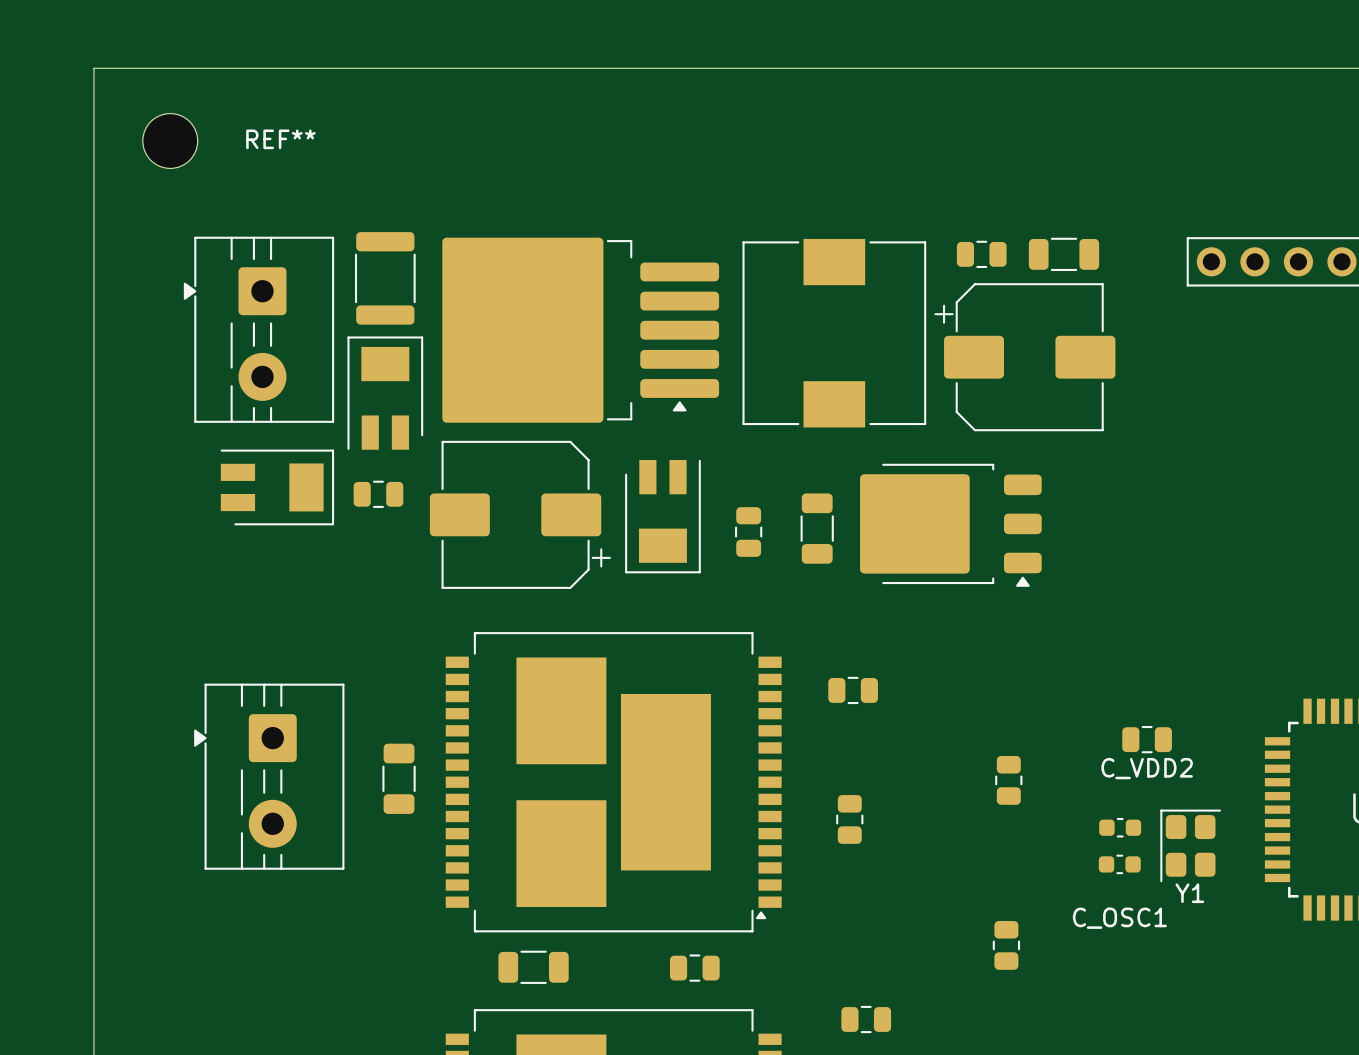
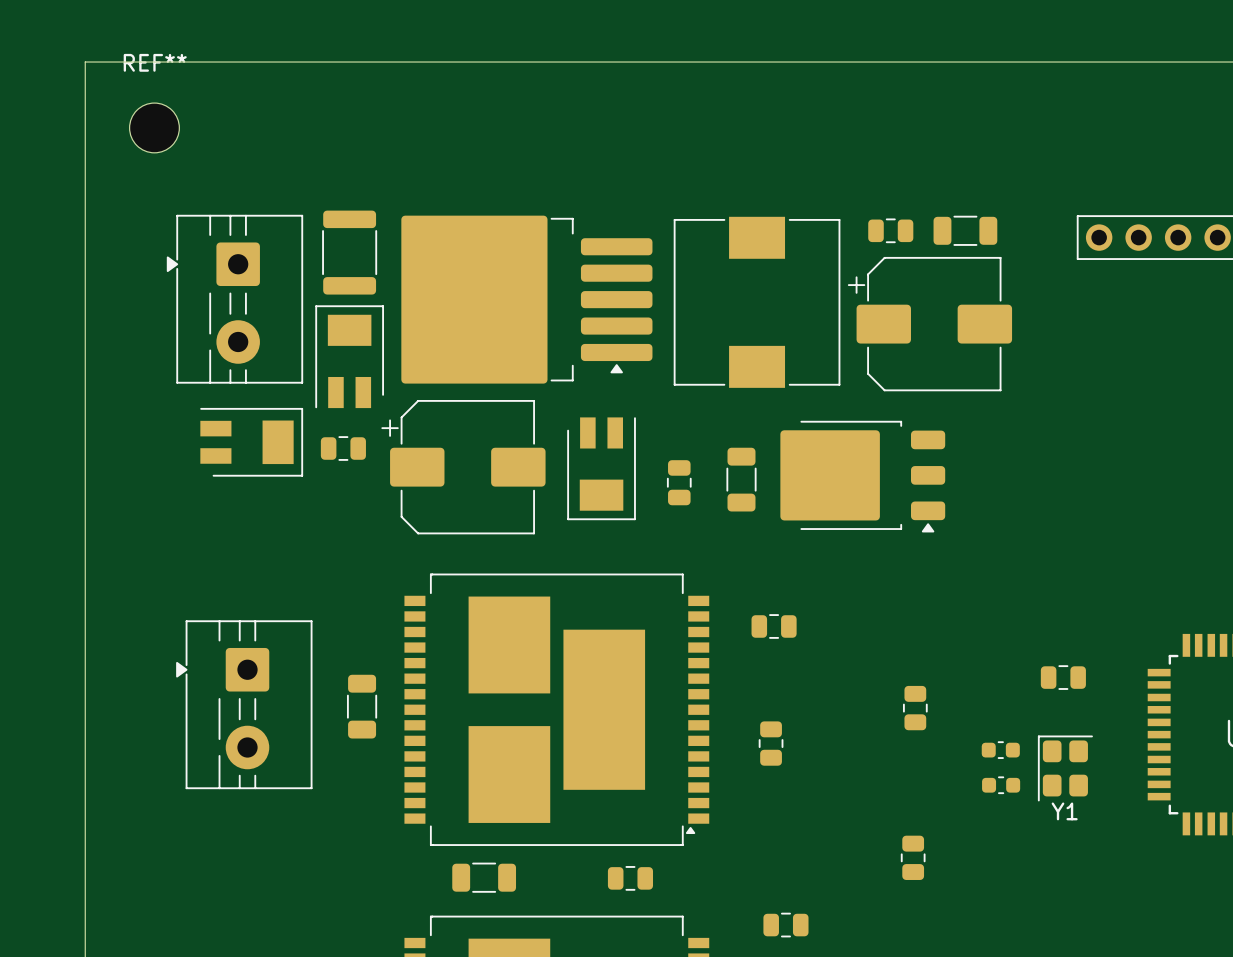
REF** name position: REF** (280, 139) -> REF** (155, 62)
part rotation: 0° (520, 514) -> 180° (463, 467)
C_VDD2: (1147, 739) -> none
part: none -> (1063, 677)
part: none -> (1000, 750)
C_OSC1: (1120, 827) -> none
Y1 position: (1190, 845) -> (1065, 768)
part position: (1119, 864) -> (1001, 785)

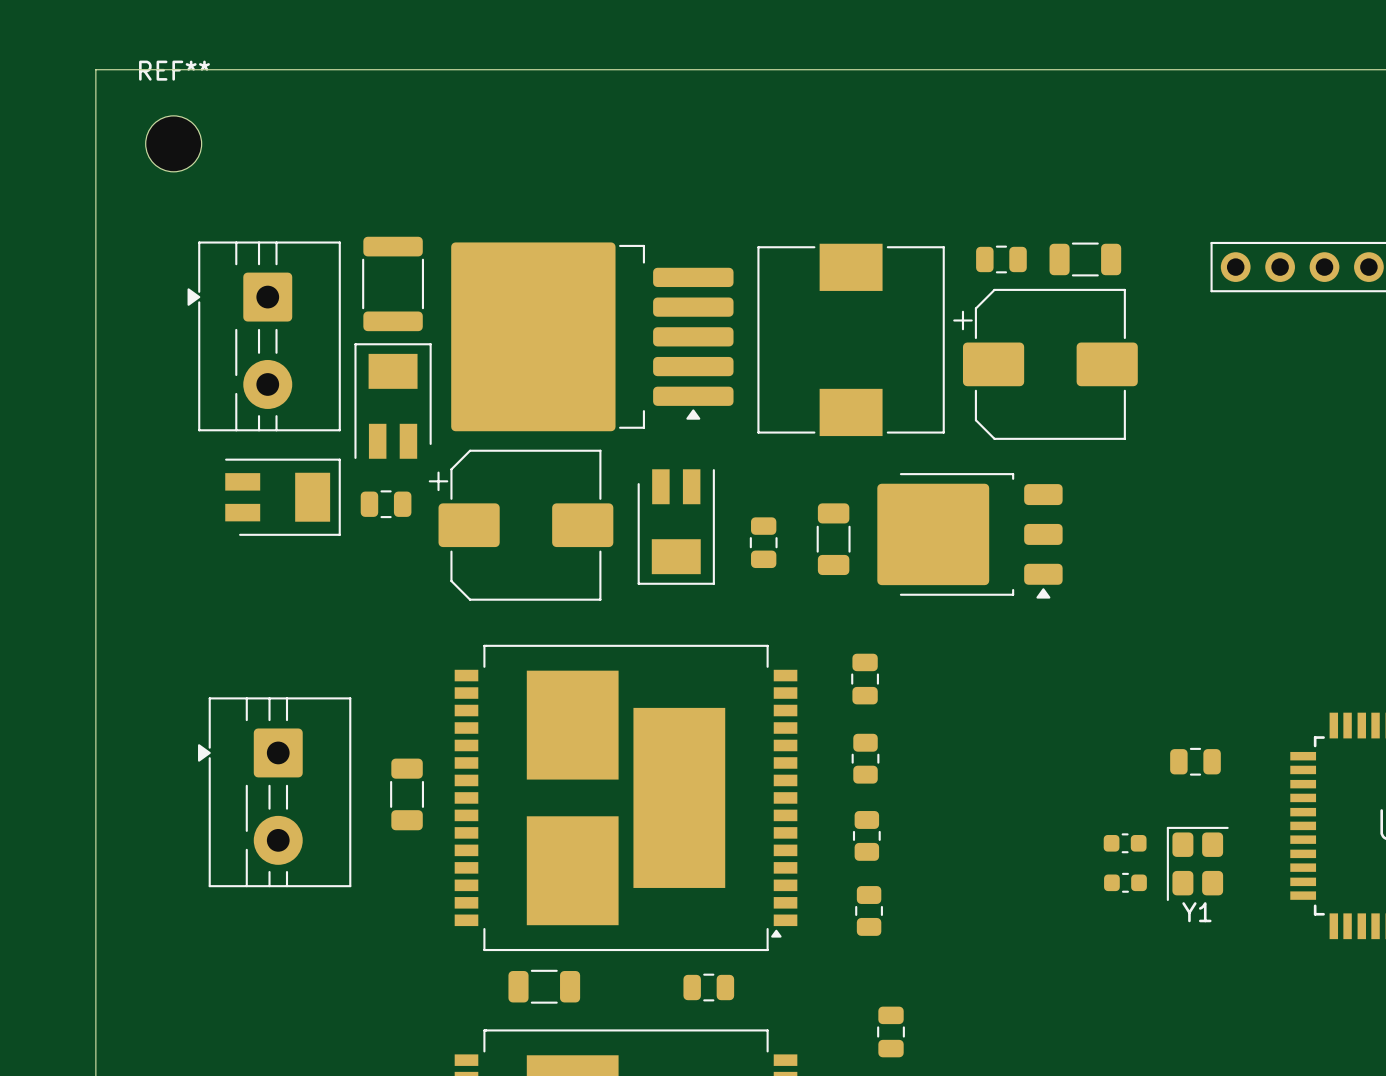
part rotation: 0° (774, 626) -> 90° clockwise (865, 679)
part: none -> (865, 758)
part: (915, 708) -> none
part: none -> (869, 910)
part: (913, 857) -> none
part rotation: 0° (785, 925) -> 90° clockwise (891, 1031)

